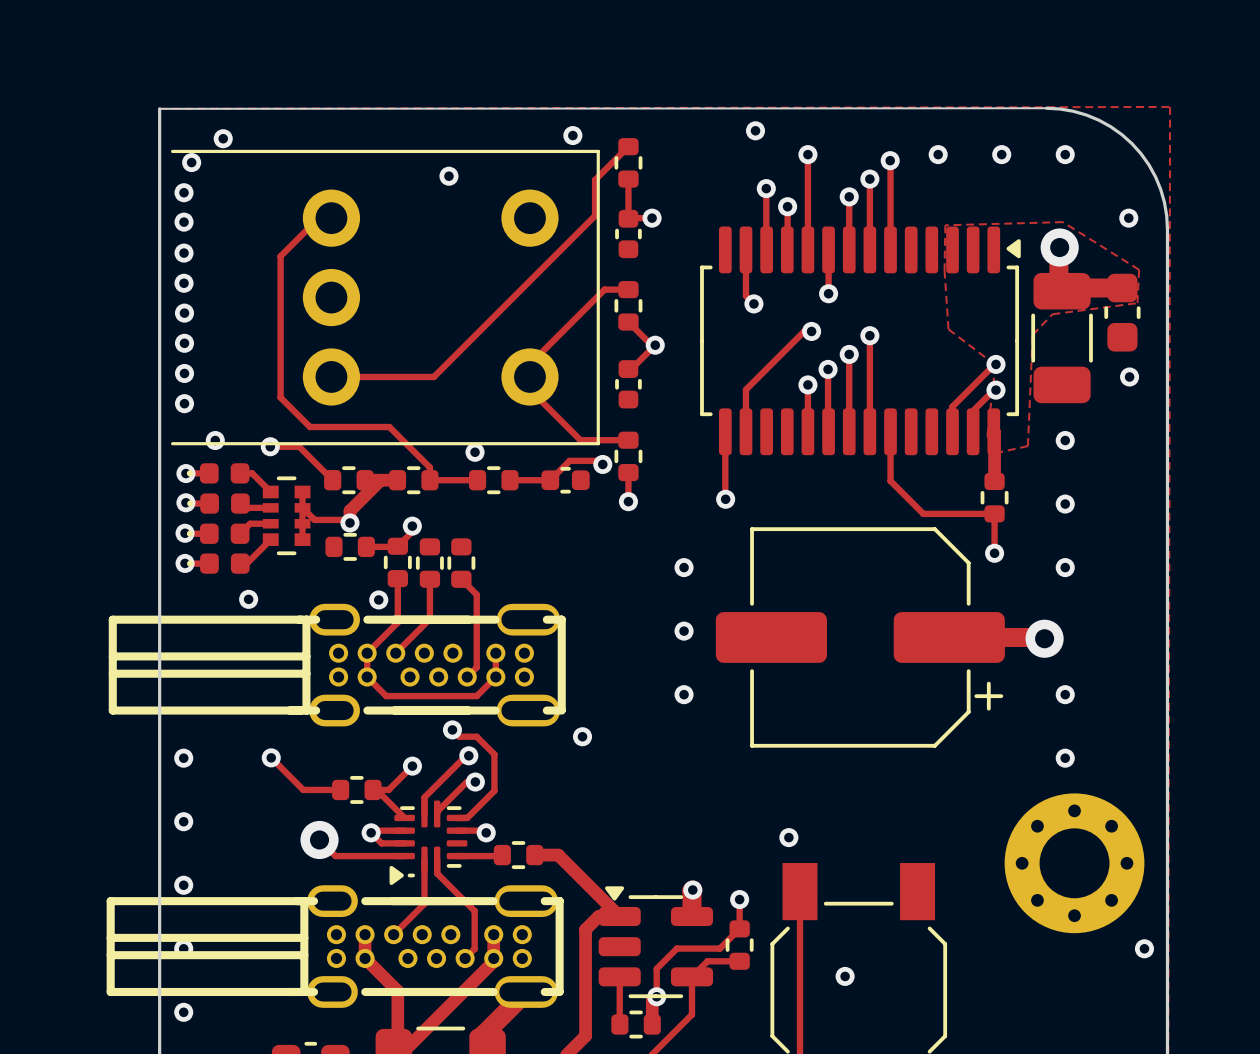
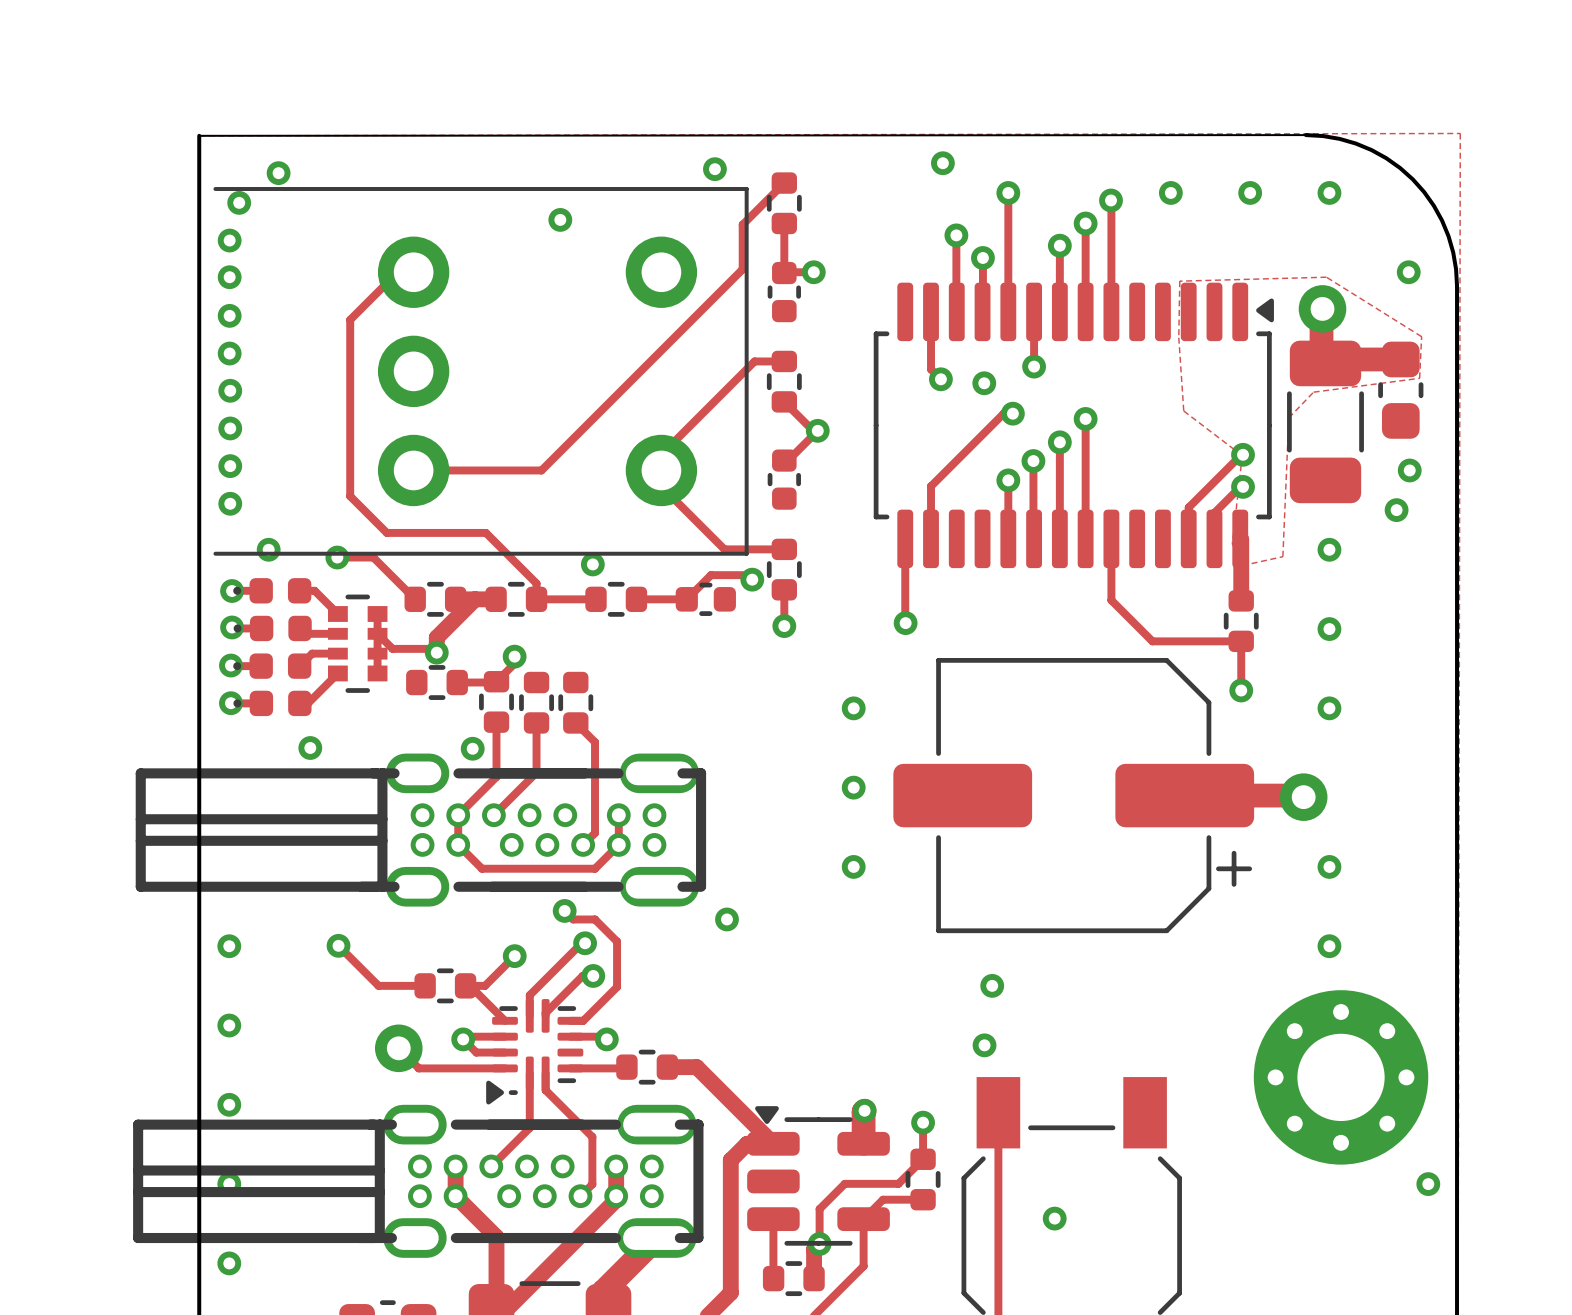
via: none -> (984, 383)
via: none -> (1396, 510)
via: none -> (992, 985)

